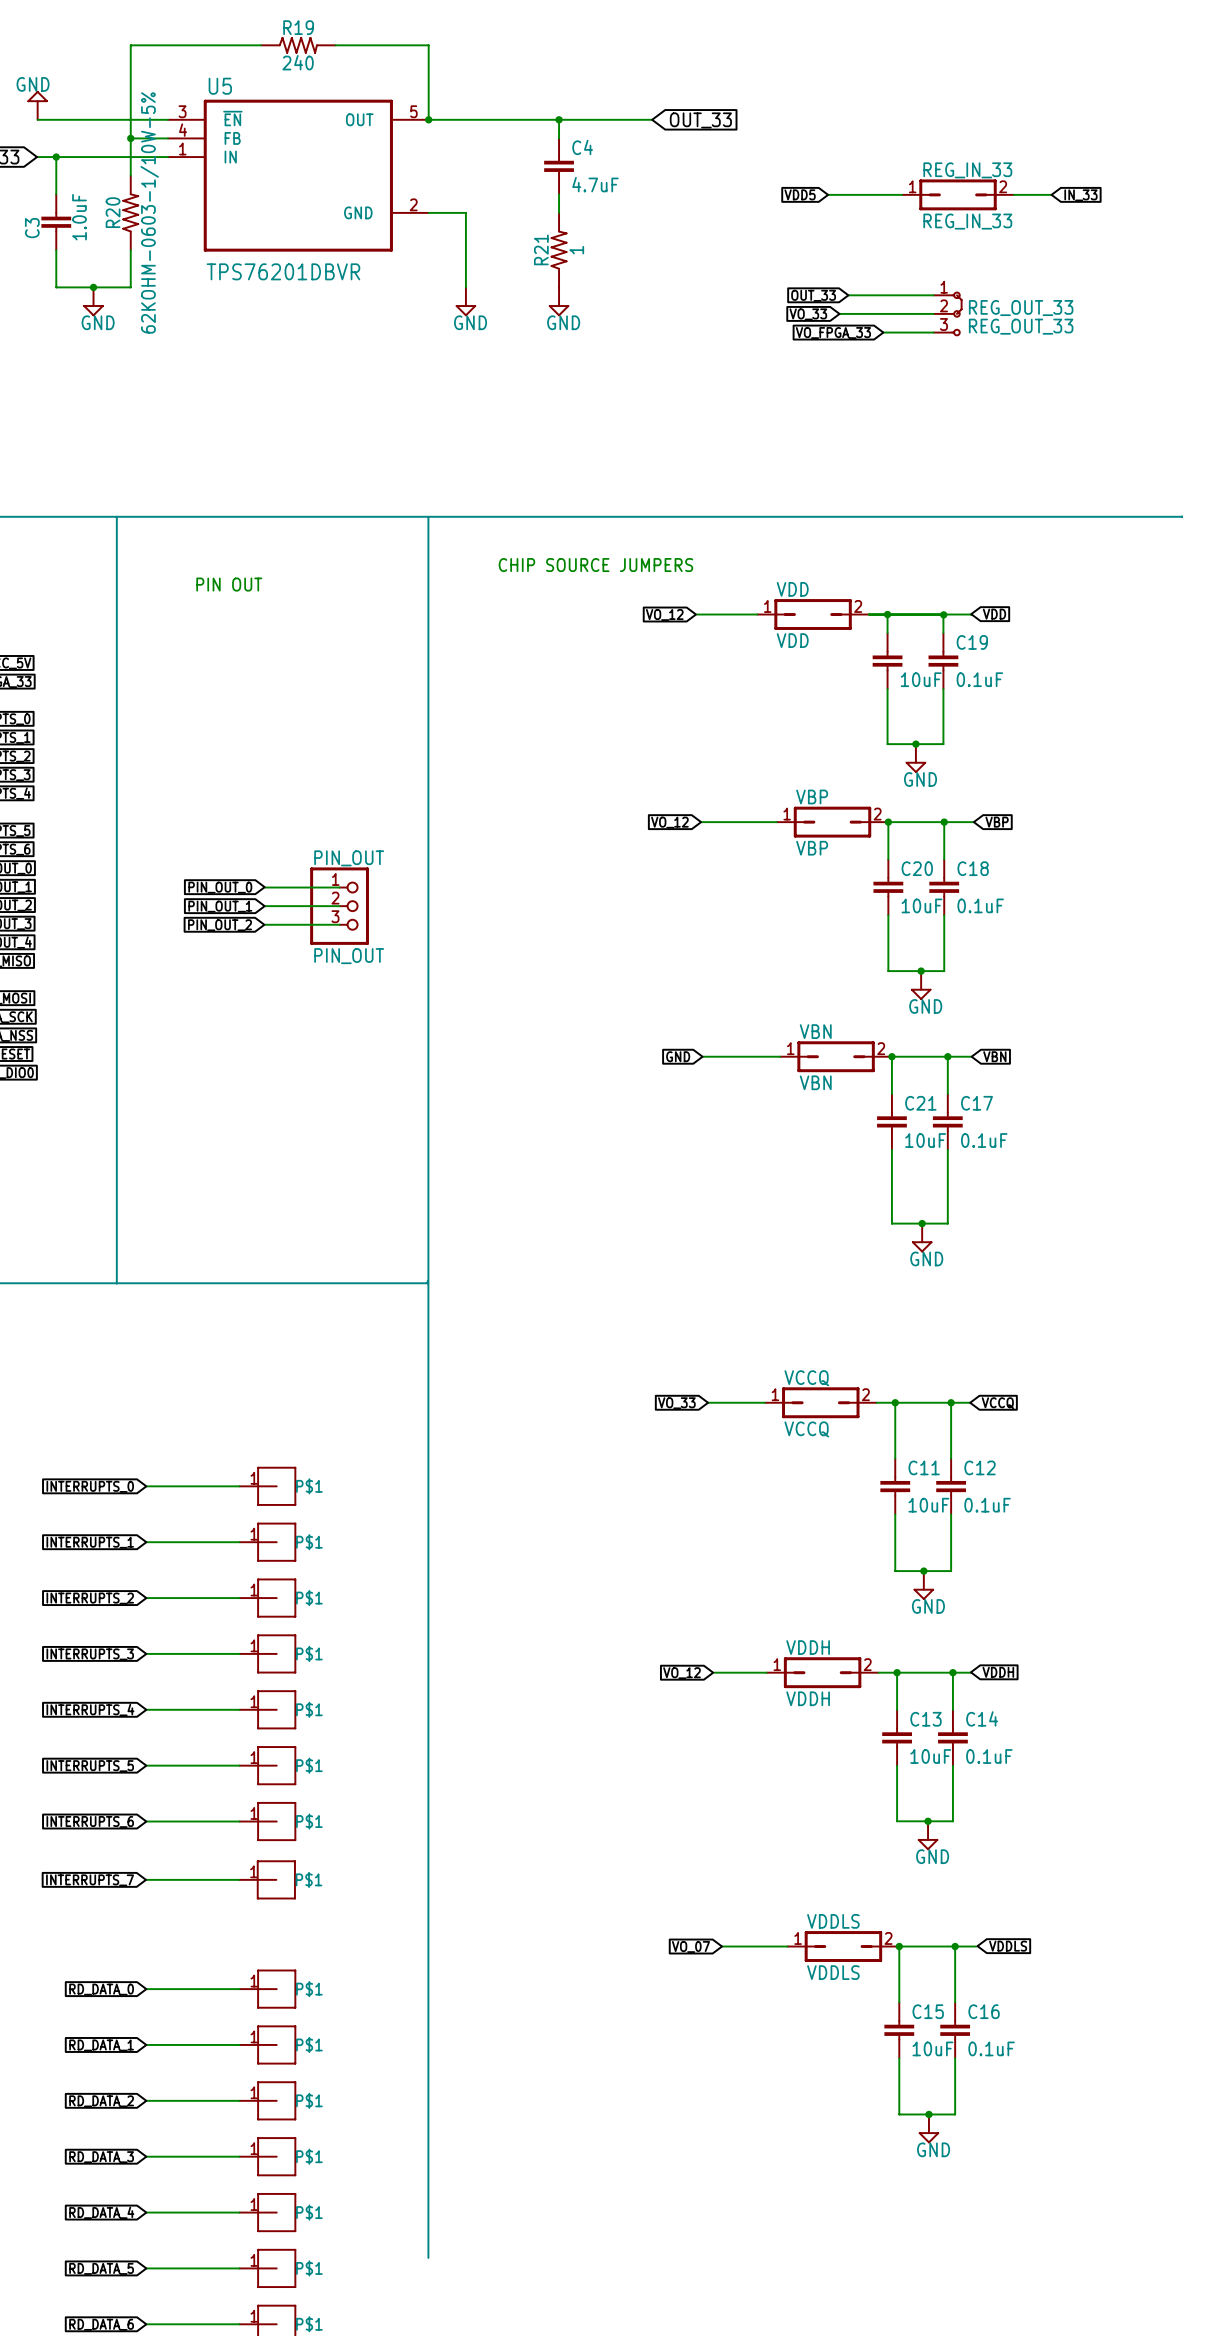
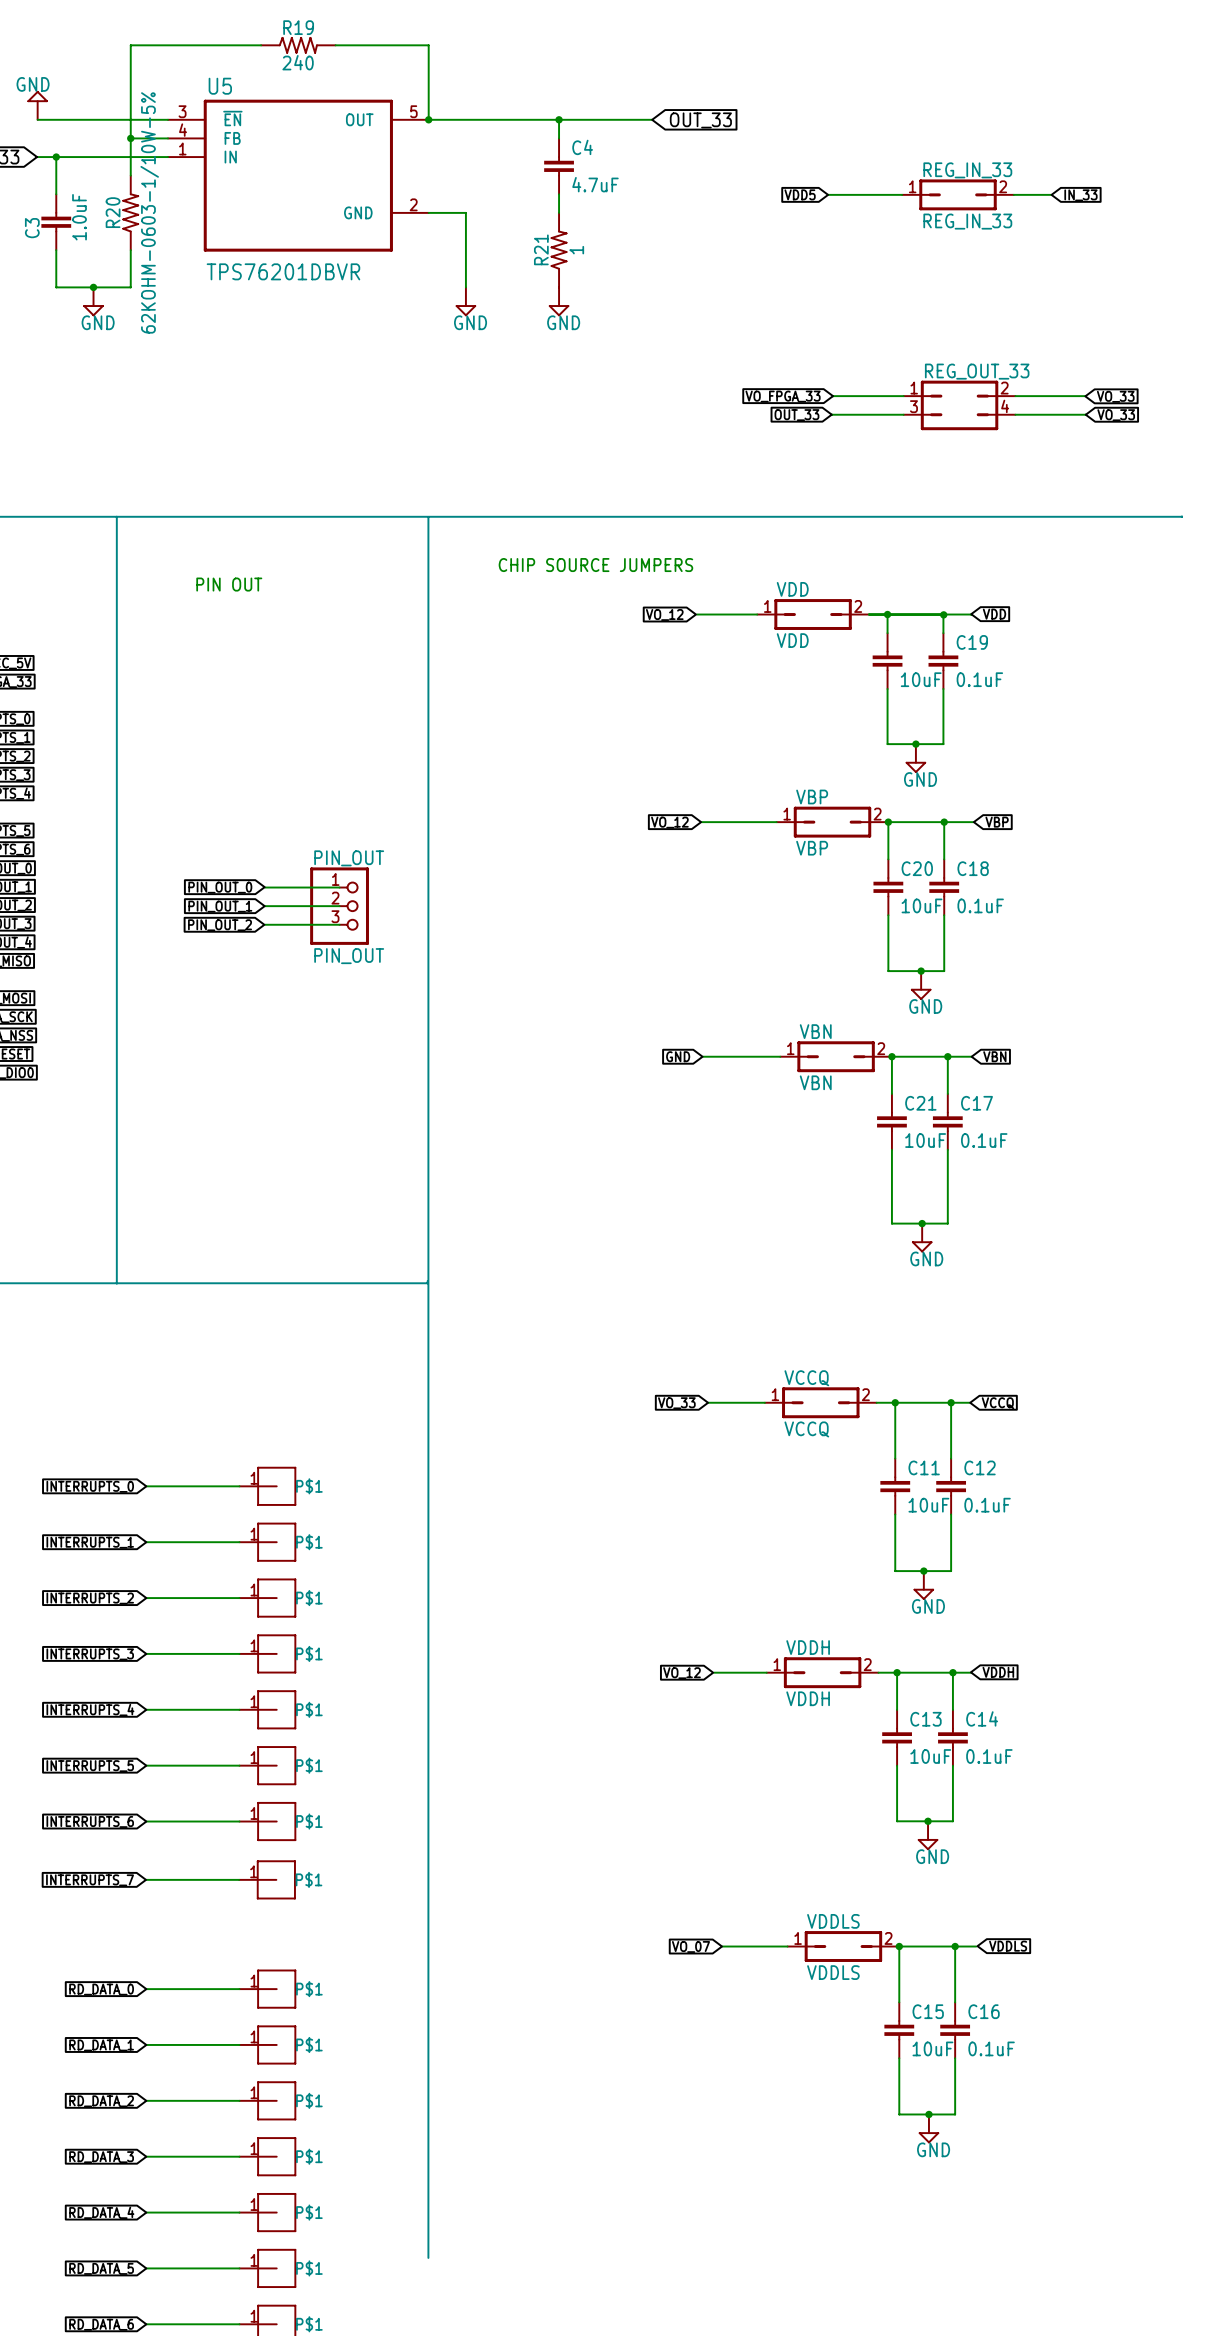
REG_OUT_33 symbol: [933, 291, 963, 337] -> [903, 380, 1016, 431]
global label position: OUT_33 (813, 295) -> OUT_33 (796, 415)
wire: (848, 295) (933, 295) -> none
REG_OUT_33 name position: REG_OUT_33 (1021, 308) -> REG_OUT_33 (977, 371)
wire: (839, 313) (933, 313) -> none
global label: VO_33 (808, 314) -> none
REG_OUT_33 value: REG_OUT_33 (1021, 326) -> none
wire: (883, 332) (933, 332) -> none
global label position: VO_FPGA_33 (833, 333) -> VO_FPGA_33 (783, 396)
wire: none -> (903, 396) (832, 396)
wire: none -> (1015, 396) (1086, 396)
global label: none -> VO_33 (1115, 396)
wire: none -> (831, 414) (903, 414)
wire: none -> (1015, 414) (1085, 414)
global label: none -> VO_33 (1116, 415)

